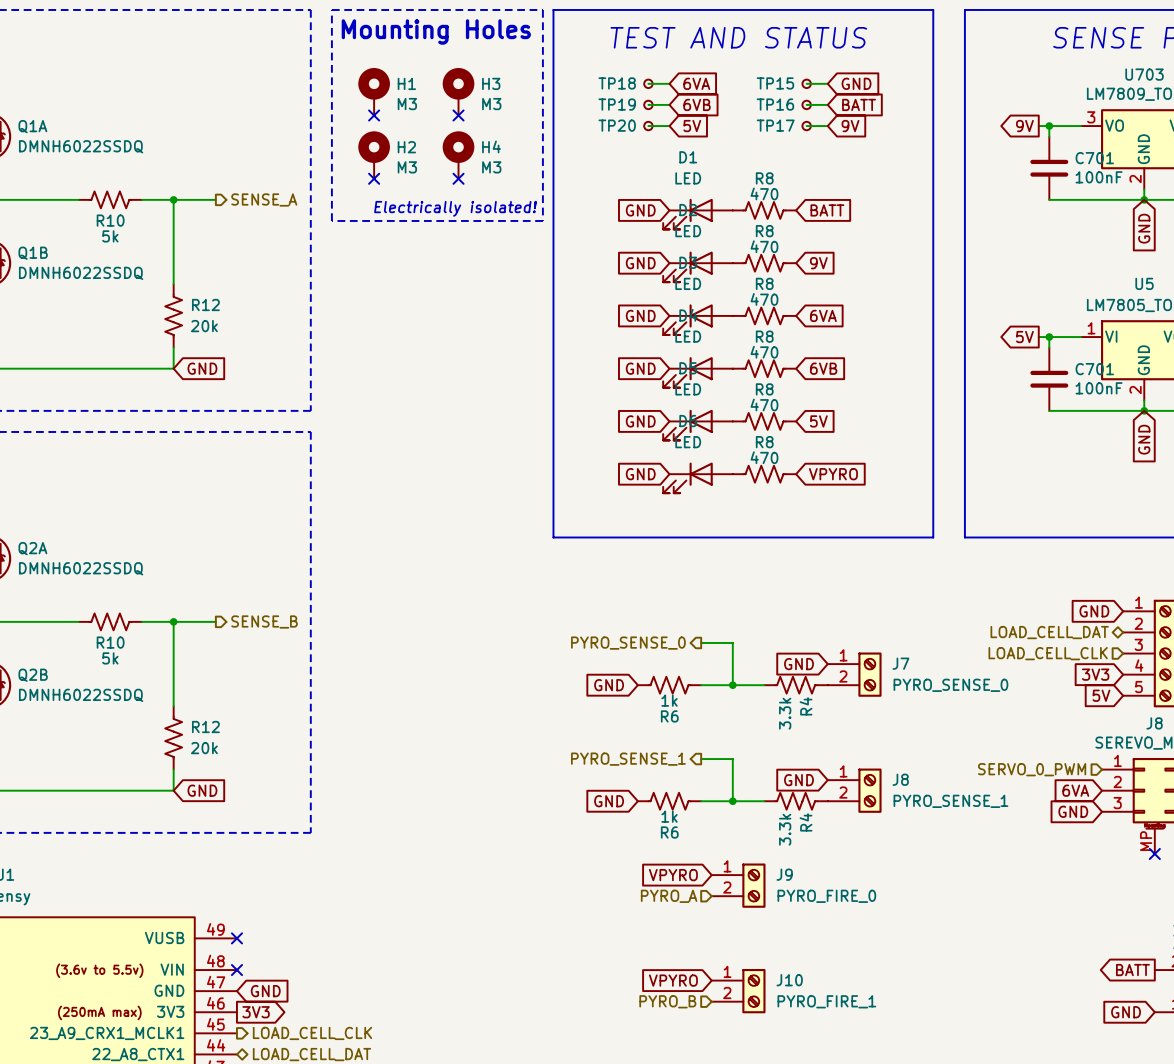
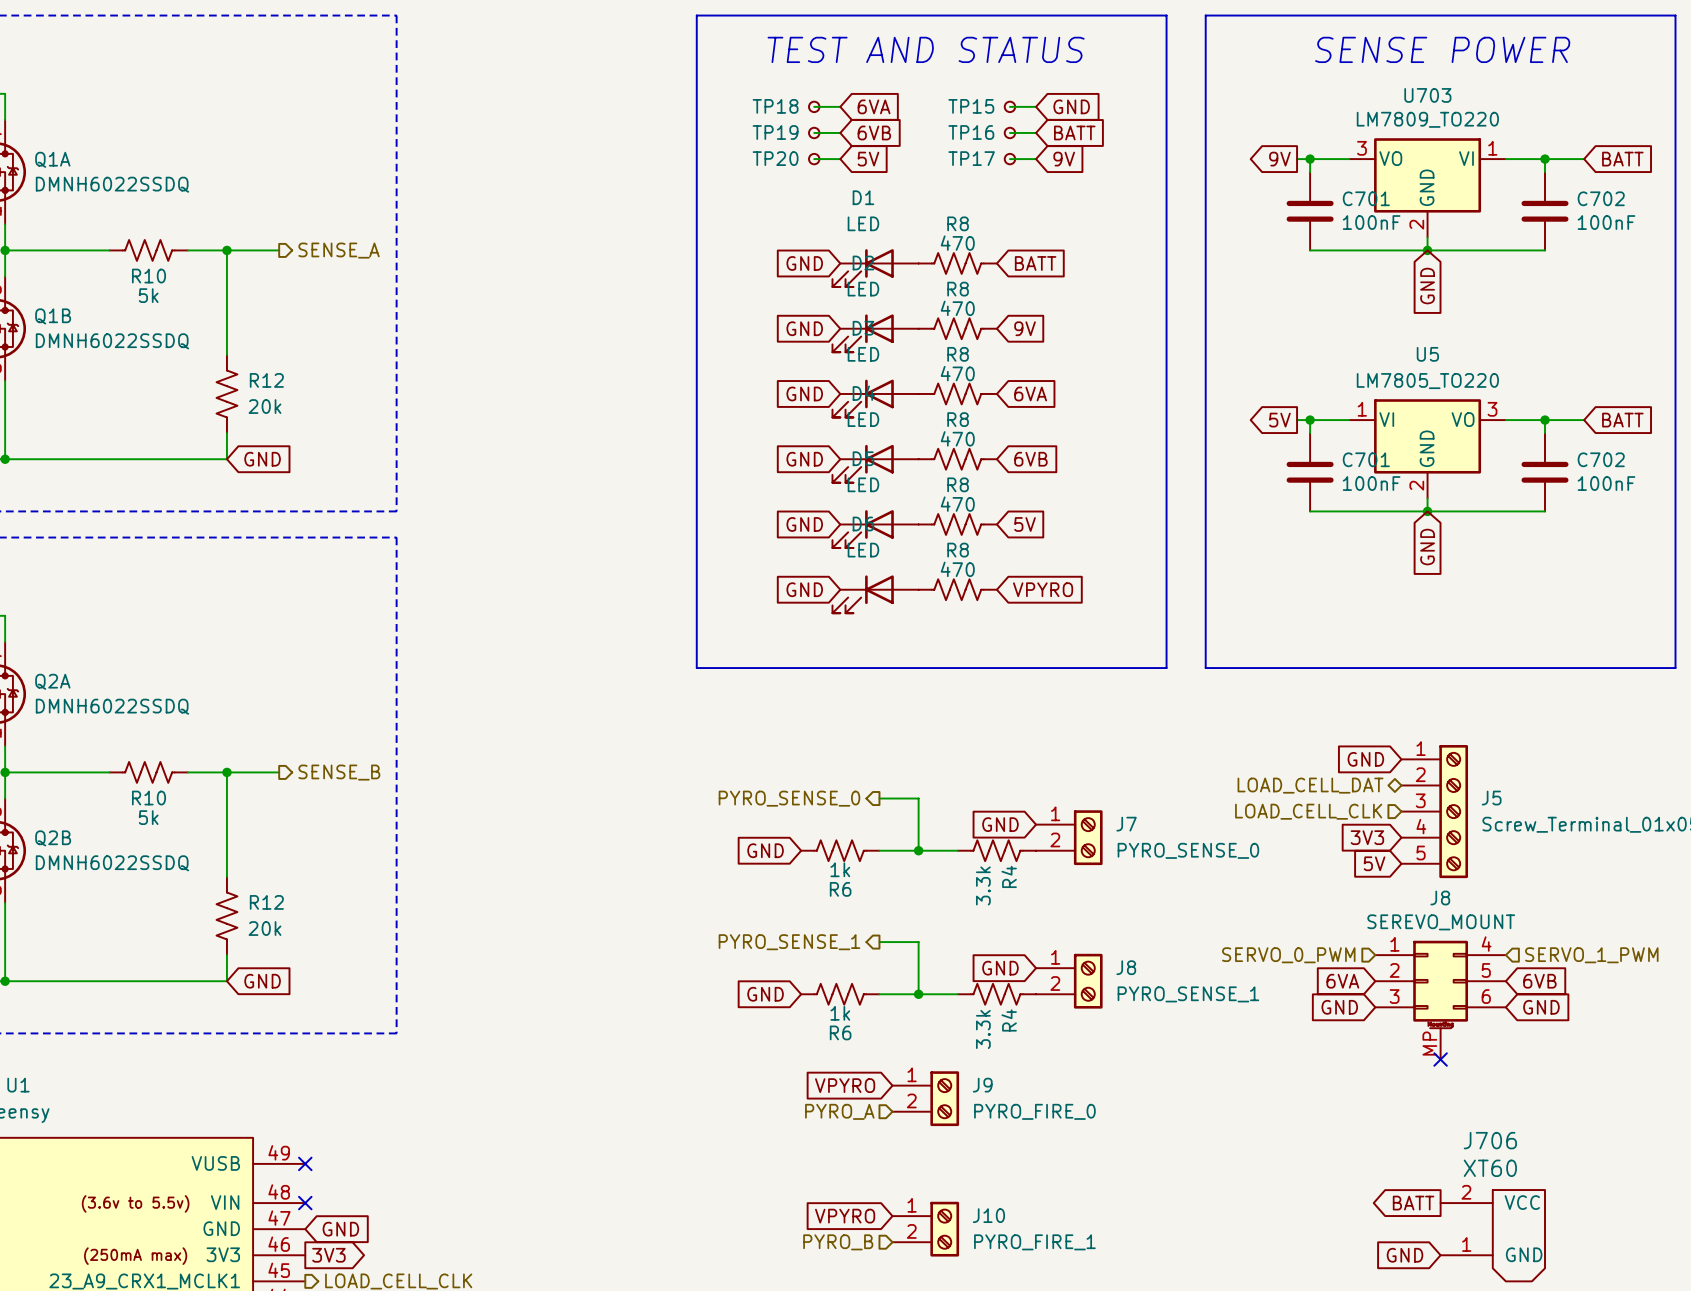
line: (331, 9) (542, 9) (542, 220) (331, 220) (331, 9) -> none
text: Mounting Holes (436, 31) -> none
H1: M3 (374, 91) -> none
H3: M3 (458, 91) -> none
no-connect mark: (374, 115) -> none
no-connect mark: (458, 115) -> none
H2: M3 (374, 155) -> none
H4: M3 (458, 155) -> none
no-connect mark: (374, 178) -> none
no-connect mark: (458, 178) -> none
text: Electrically isolated! (455, 208) -> none

